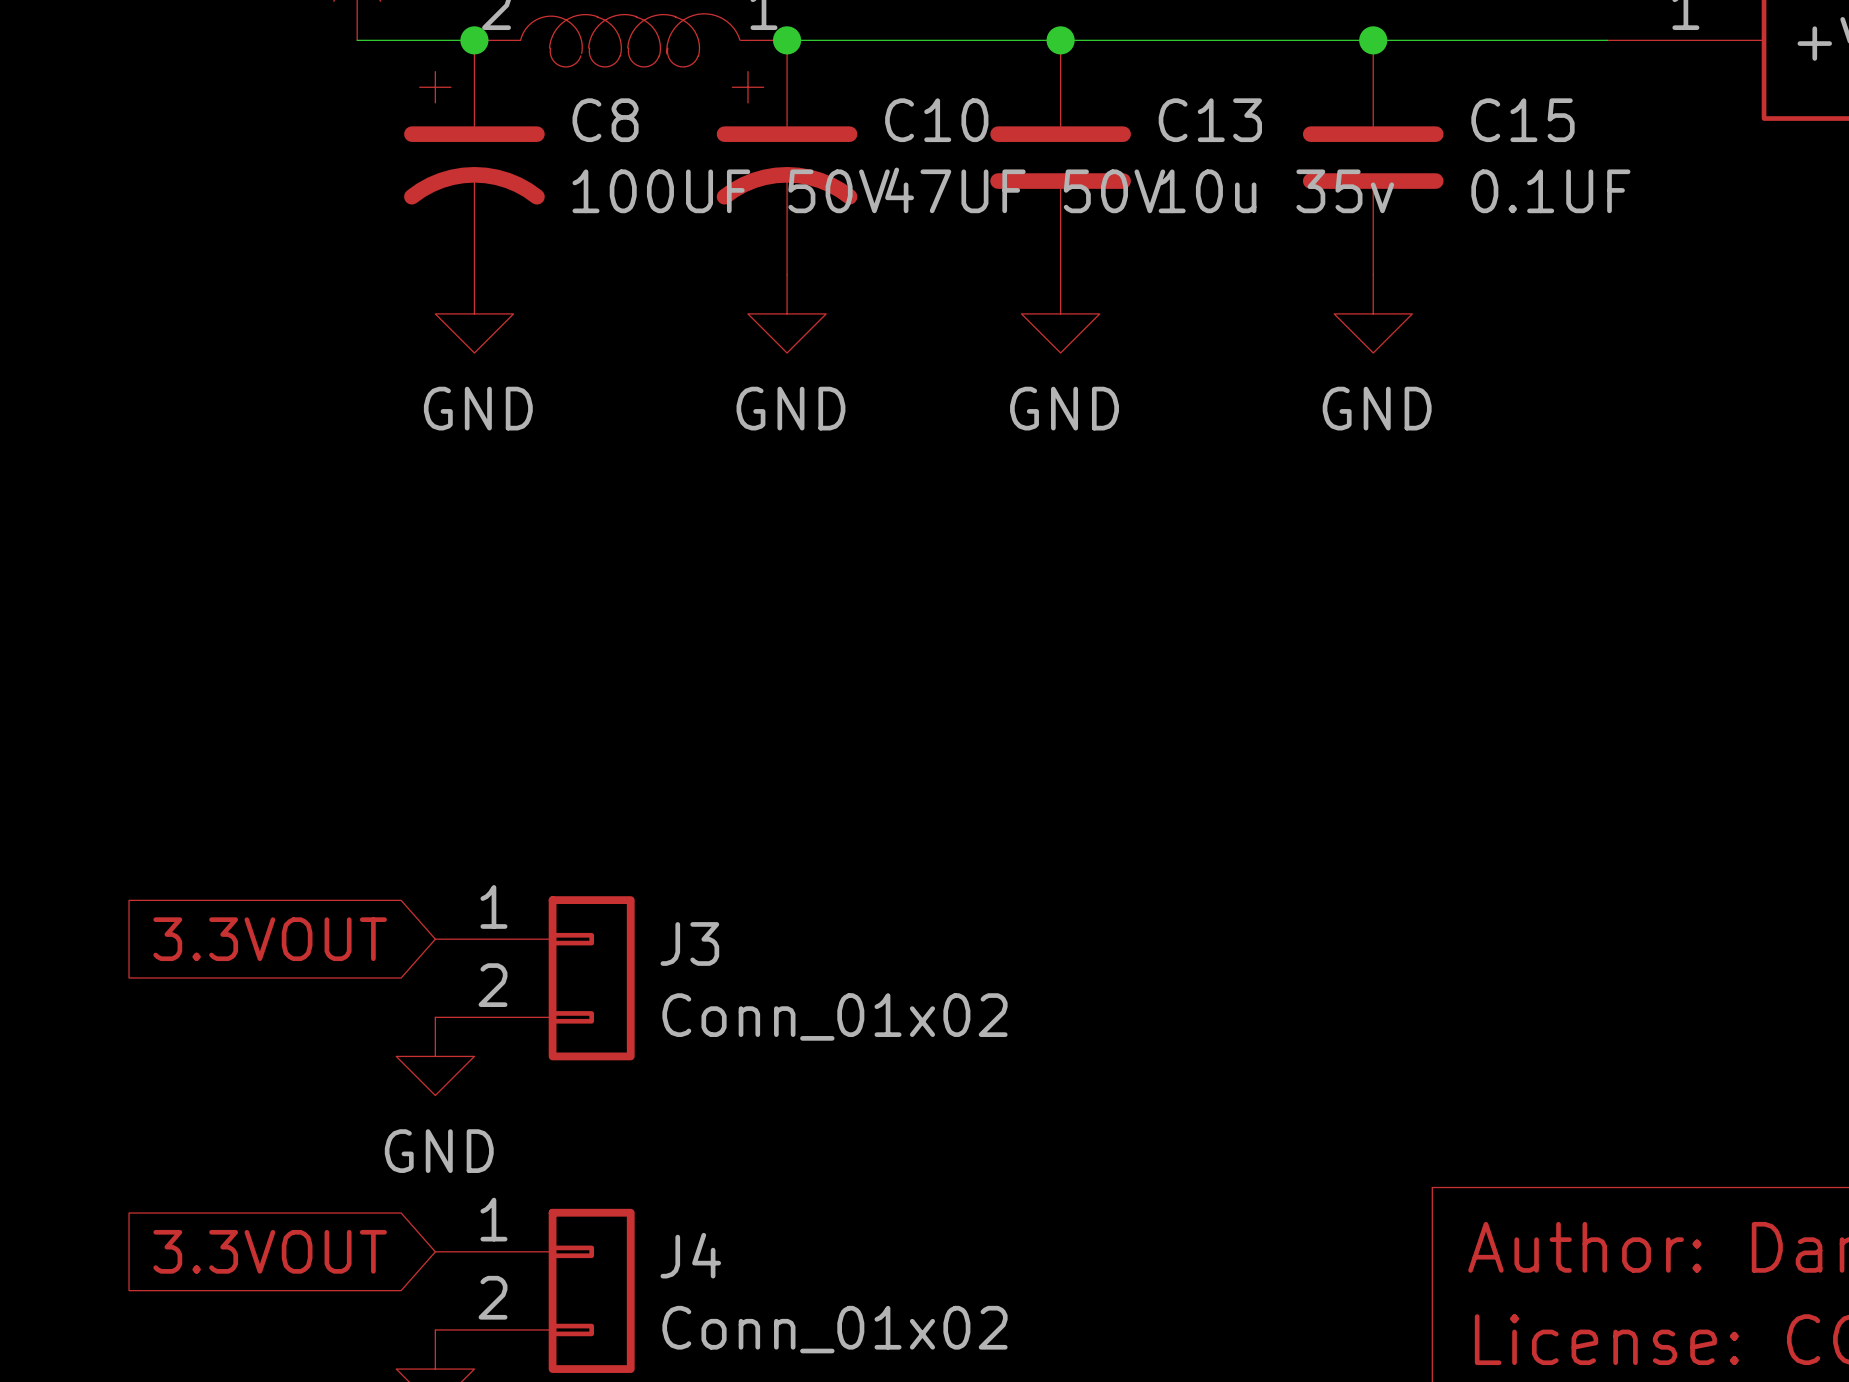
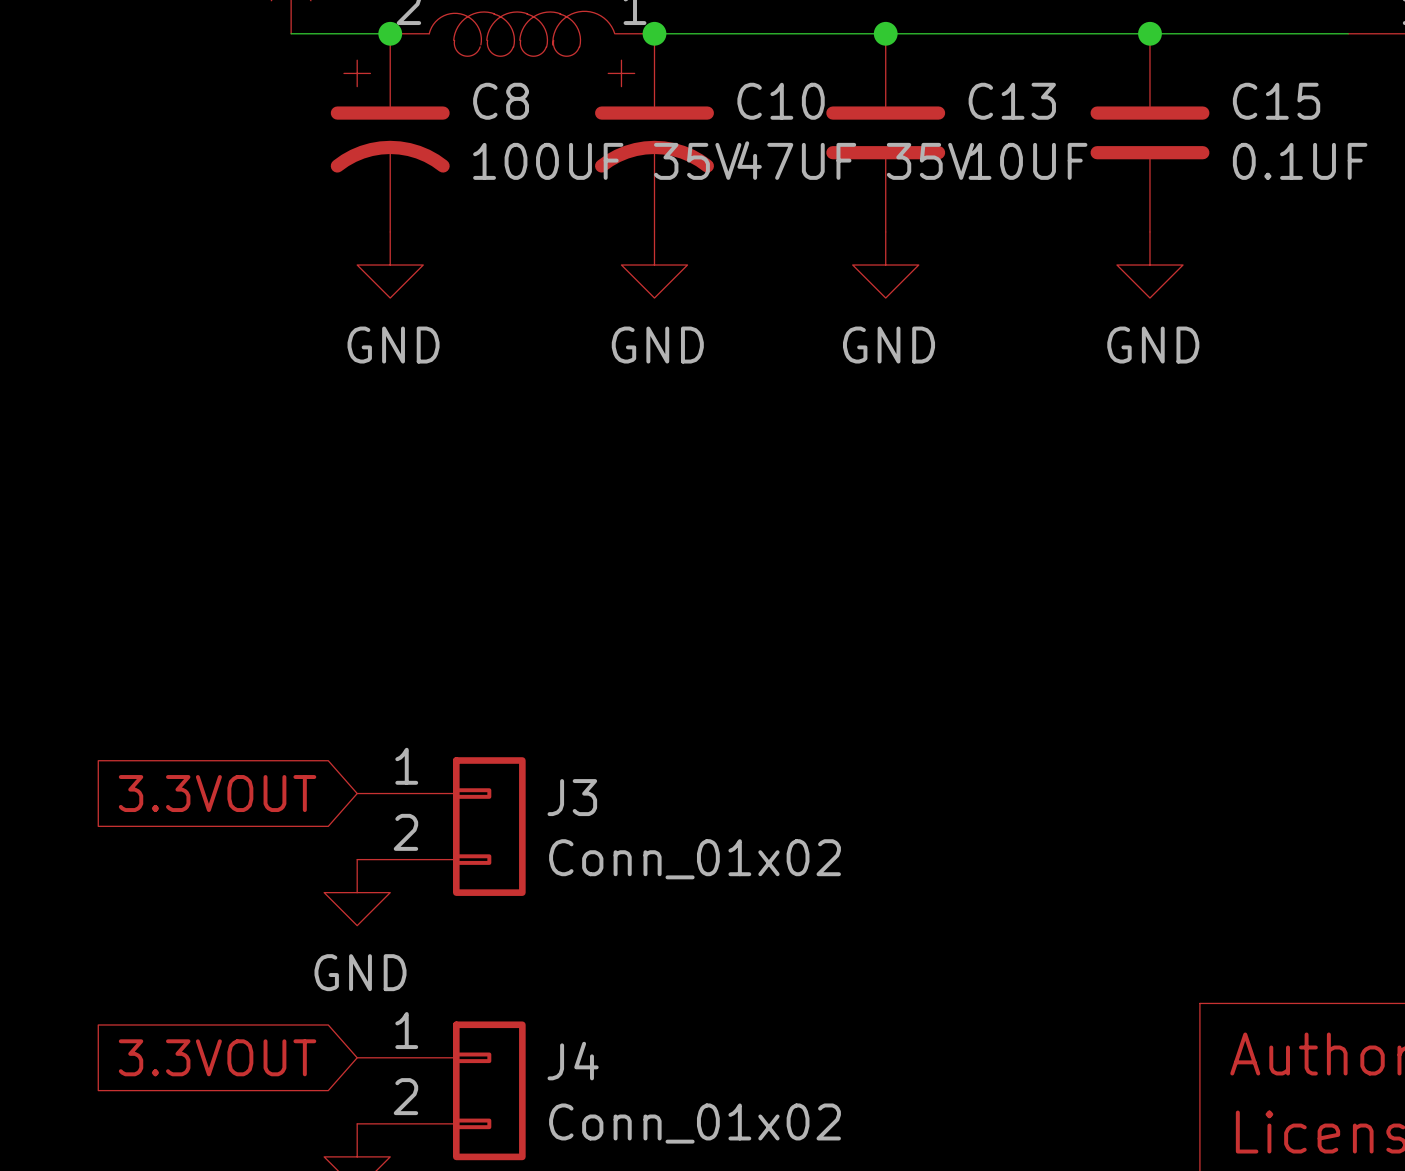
C10 value: 47UF 50V (1025, 190) -> 47UF 35V (855, 160)
C8 value: 100UF 50V (731, 191) -> 100UF 35V (607, 161)
C13 value: 10u 35v (1276, 191) -> 10UF (1028, 161)

